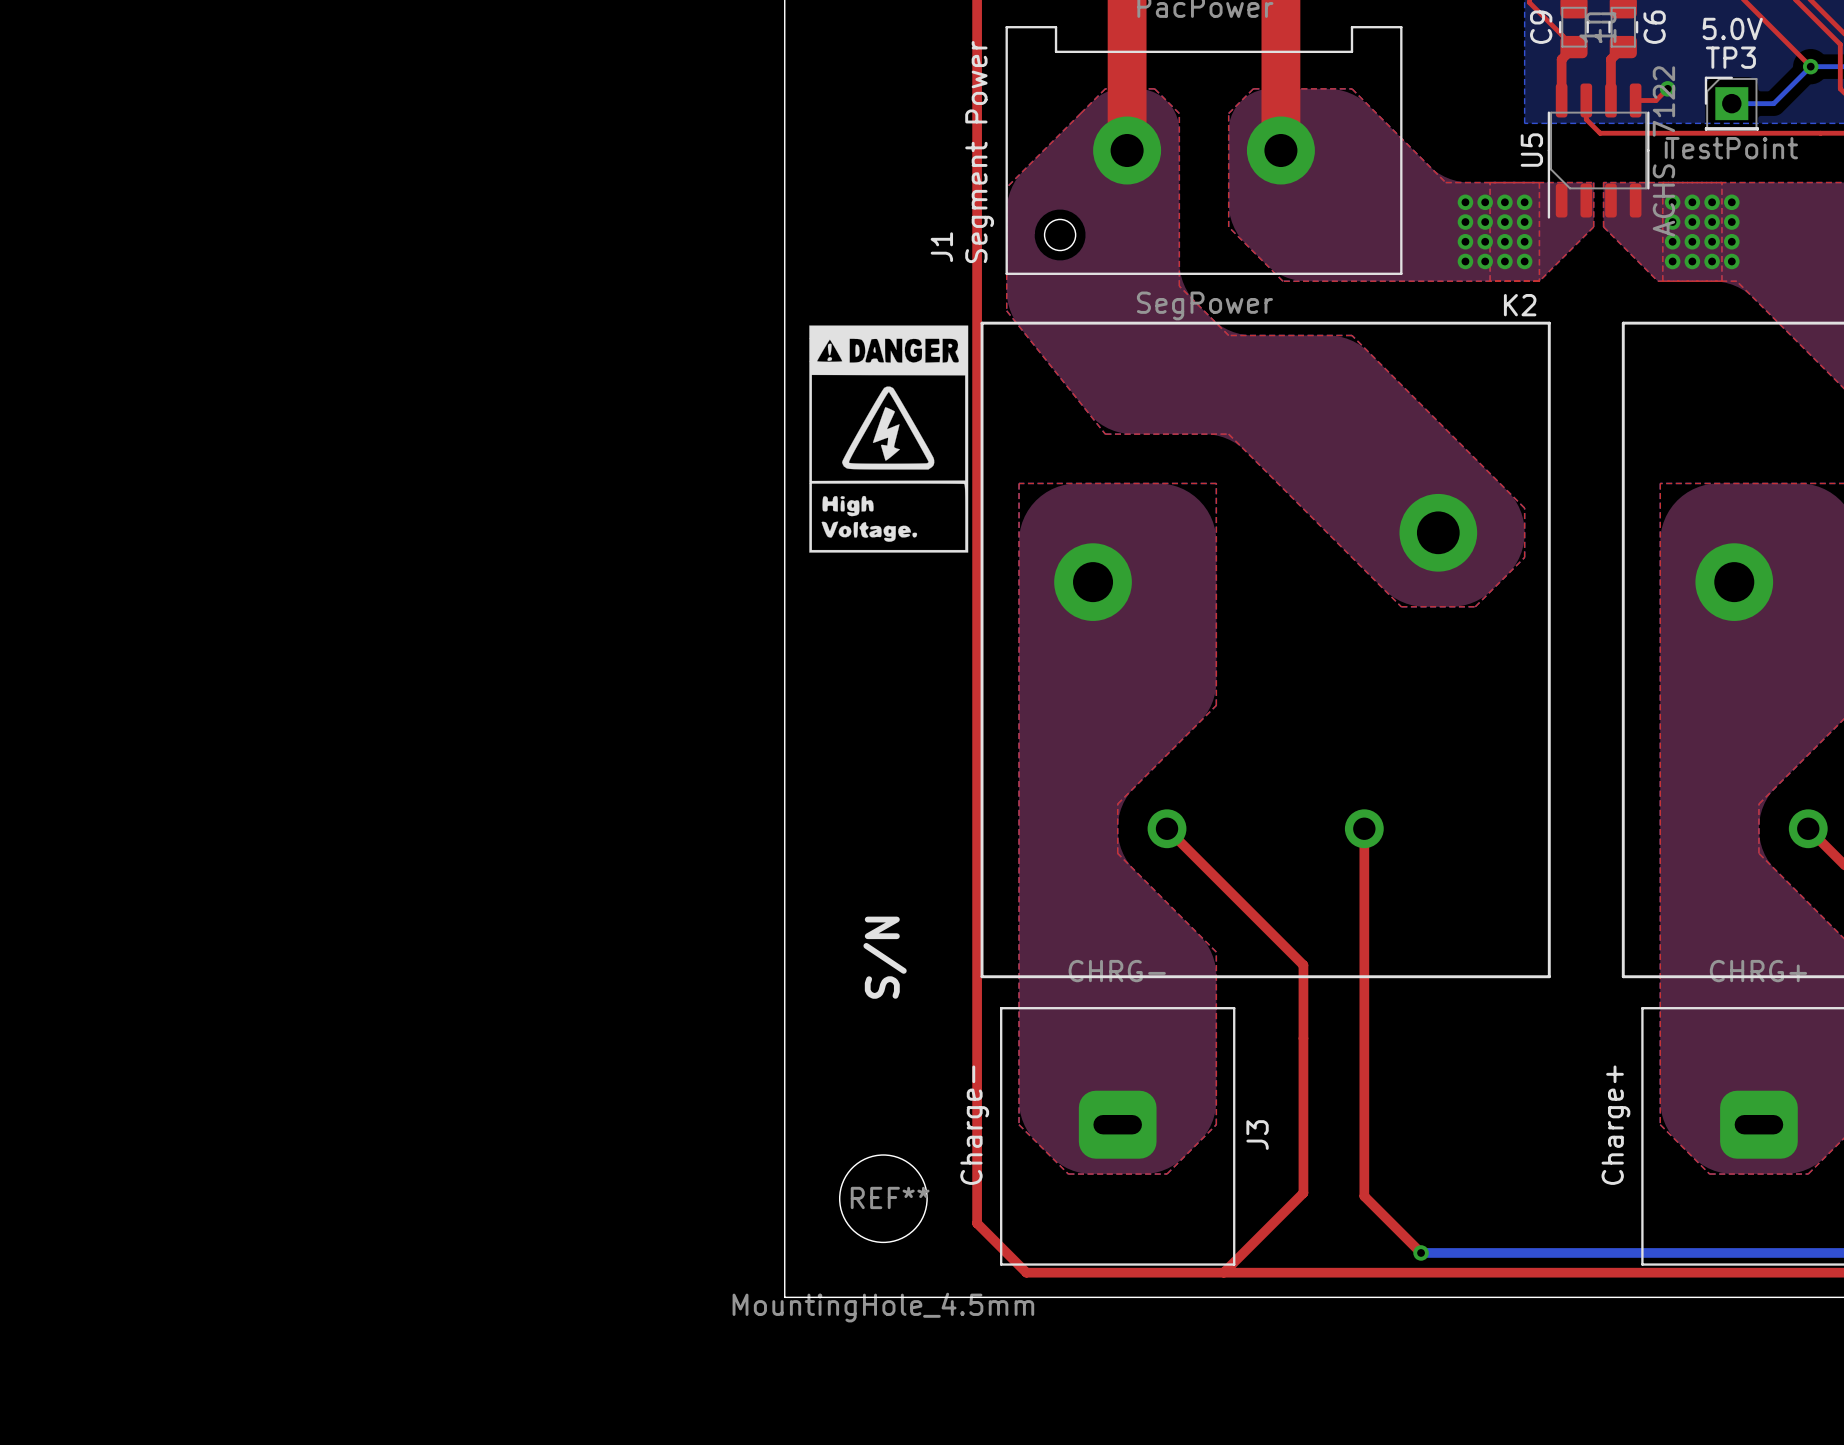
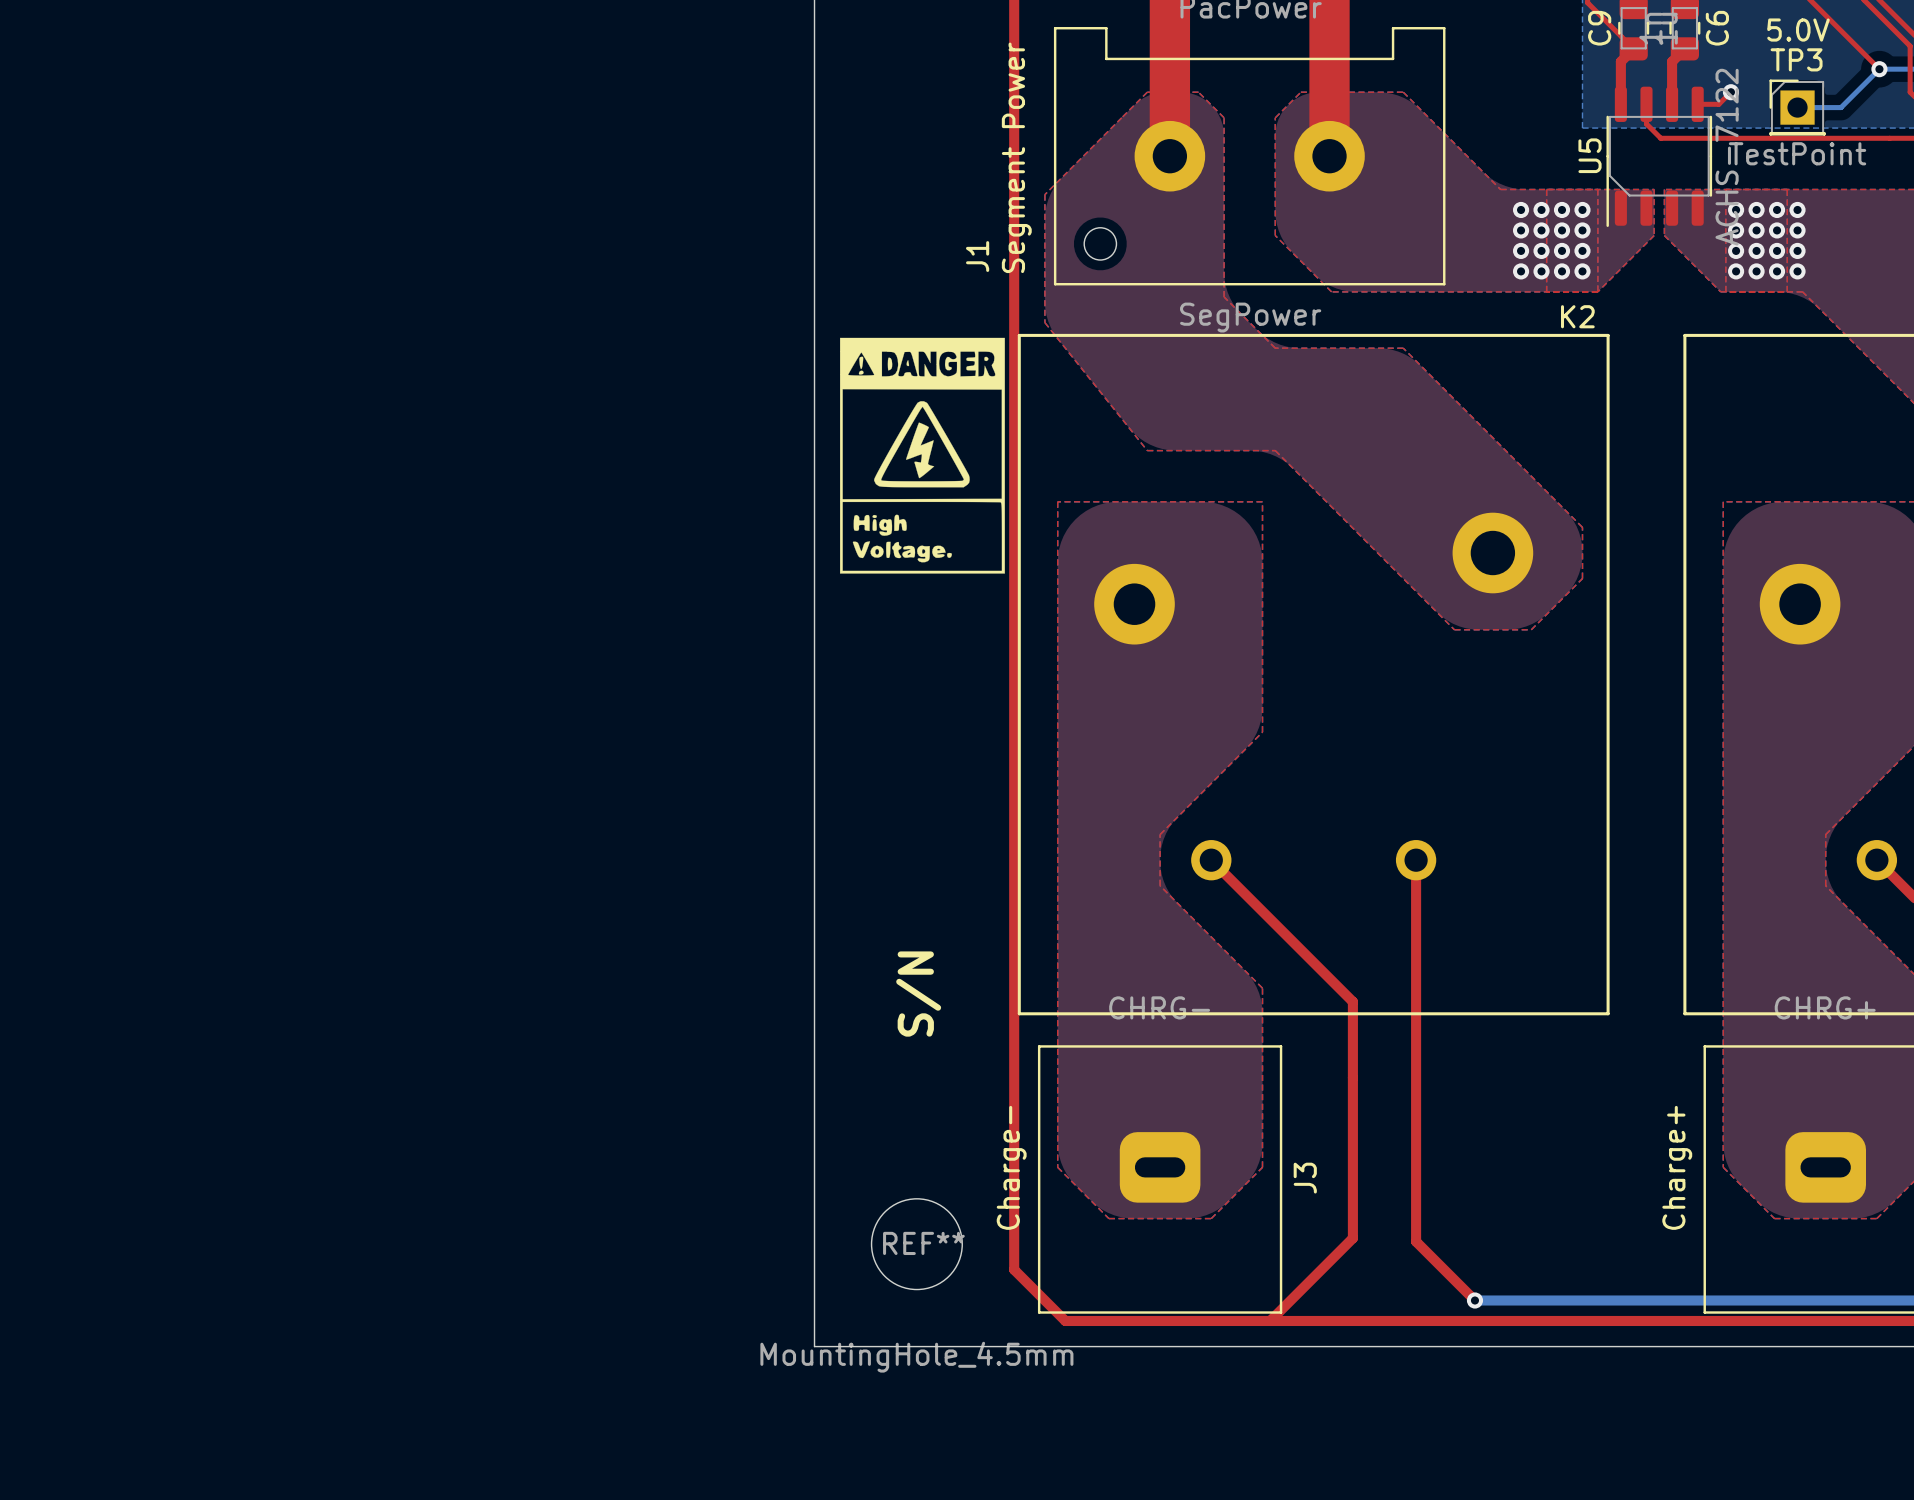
J1 footprint: [1005, 26, 1403, 275] -> [1053, 27, 1446, 286]

